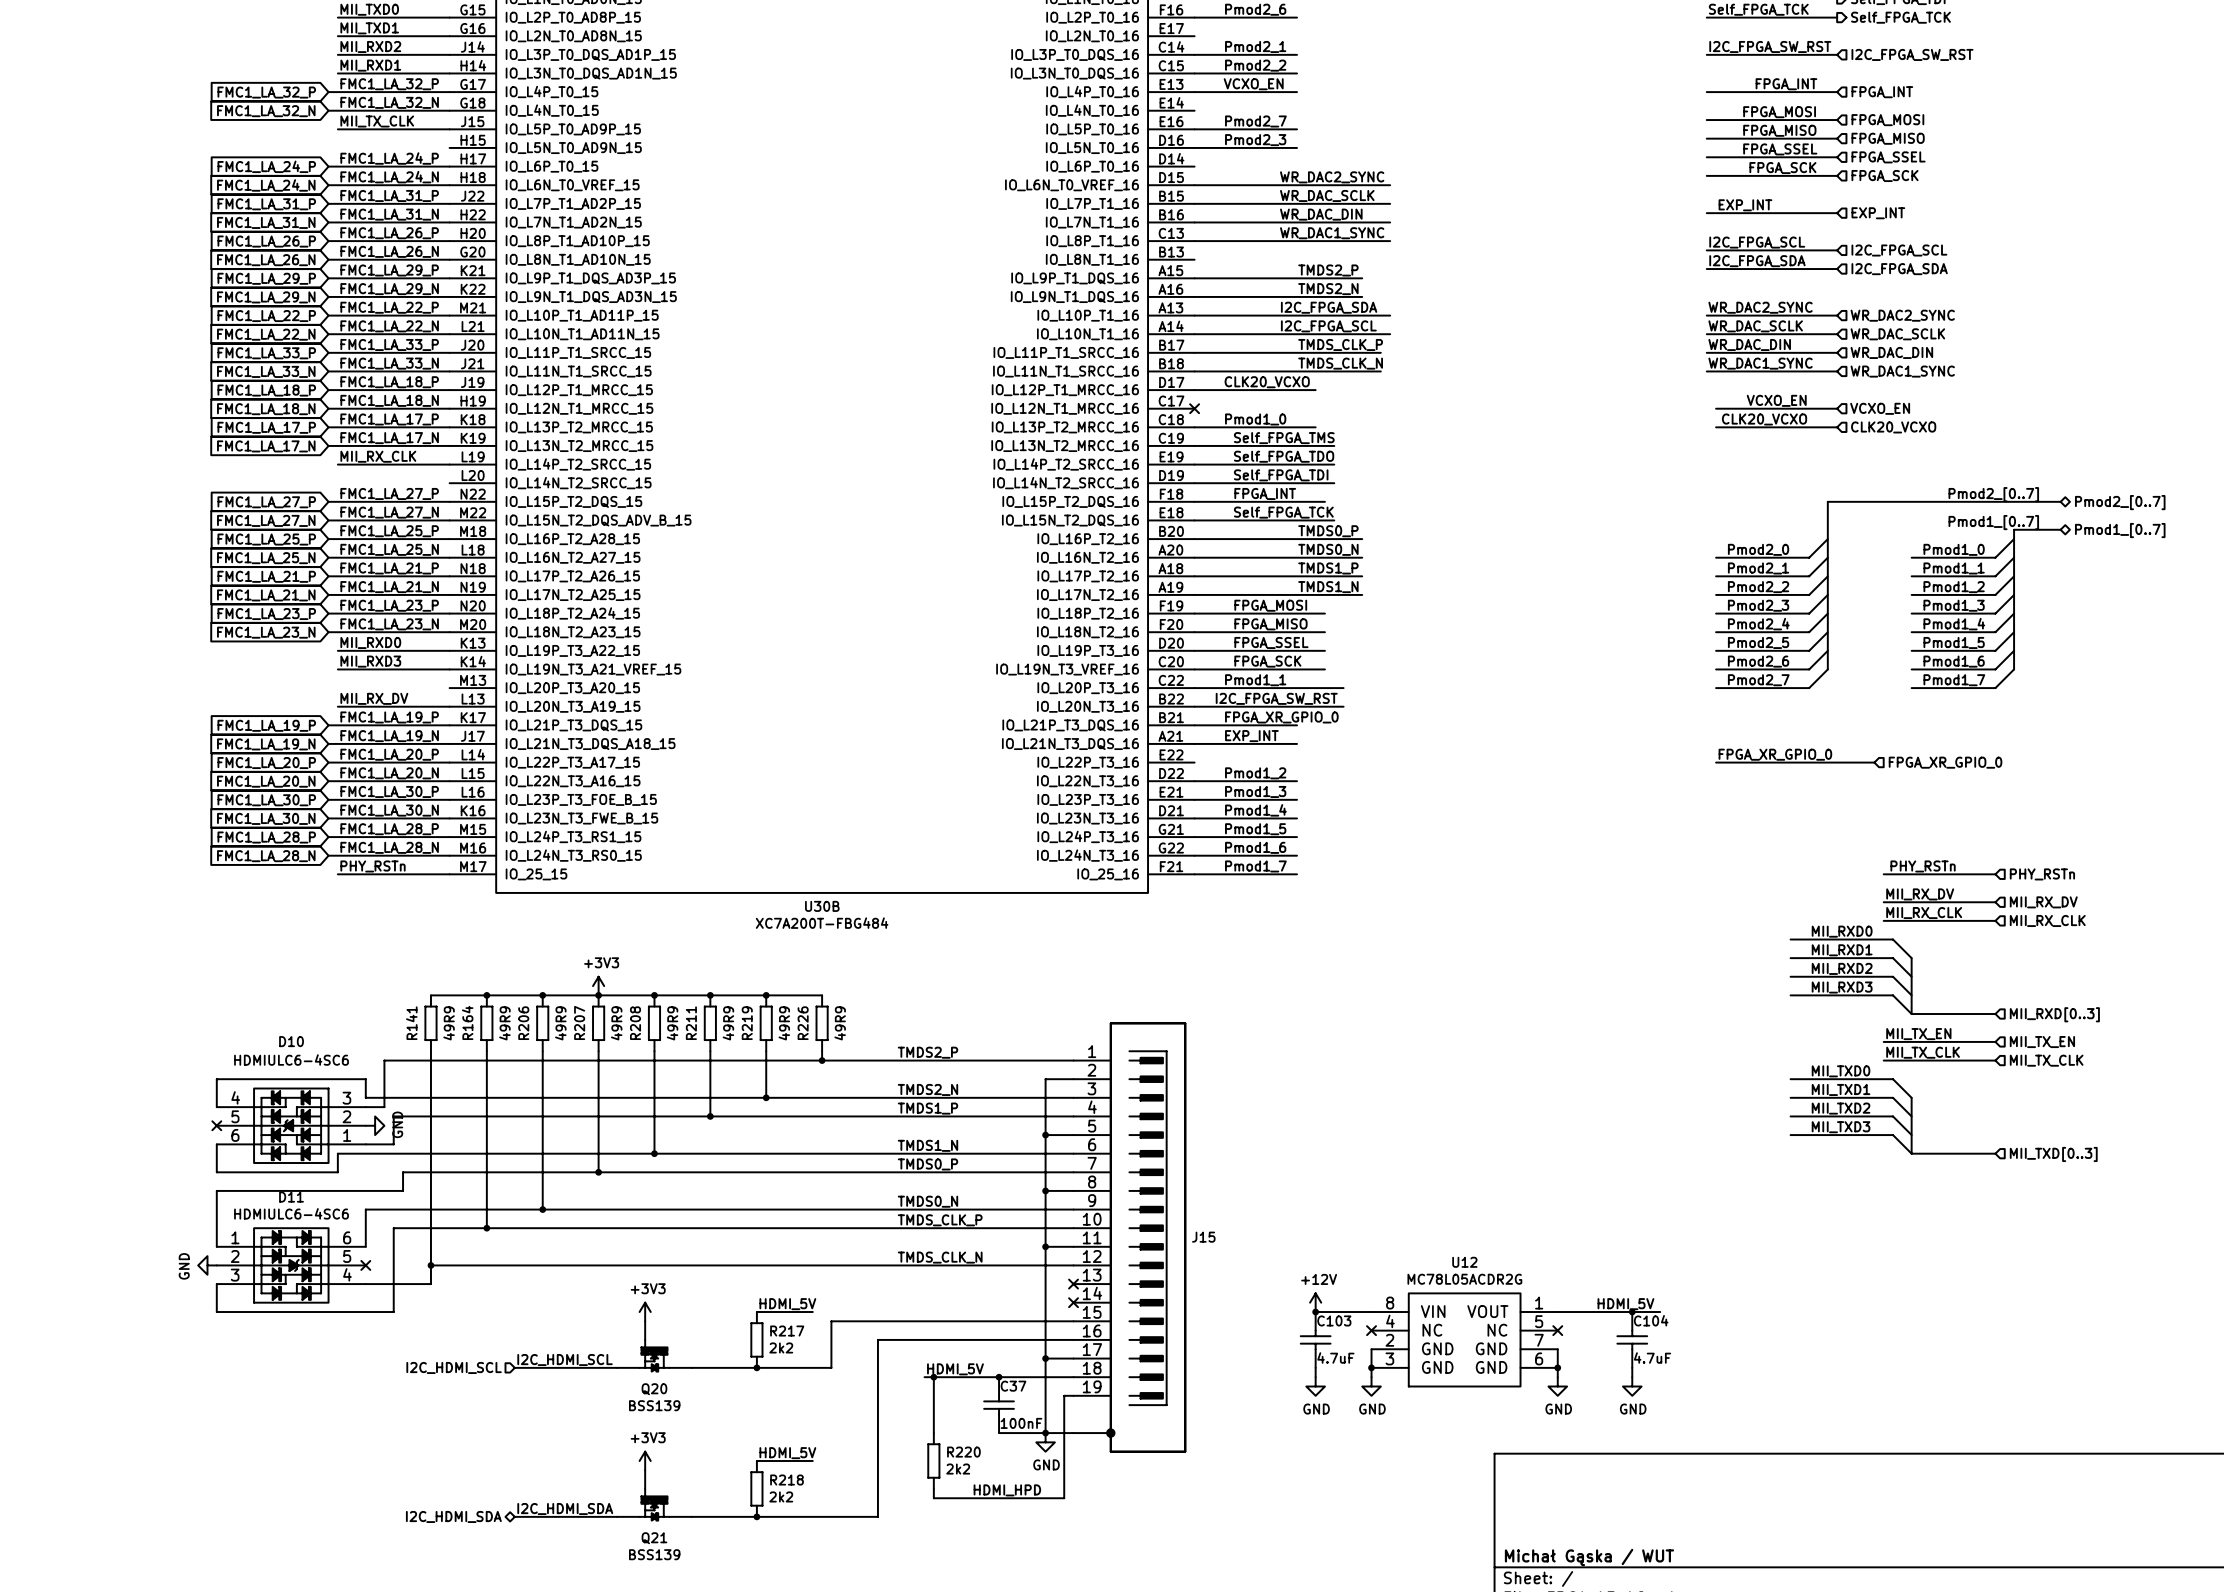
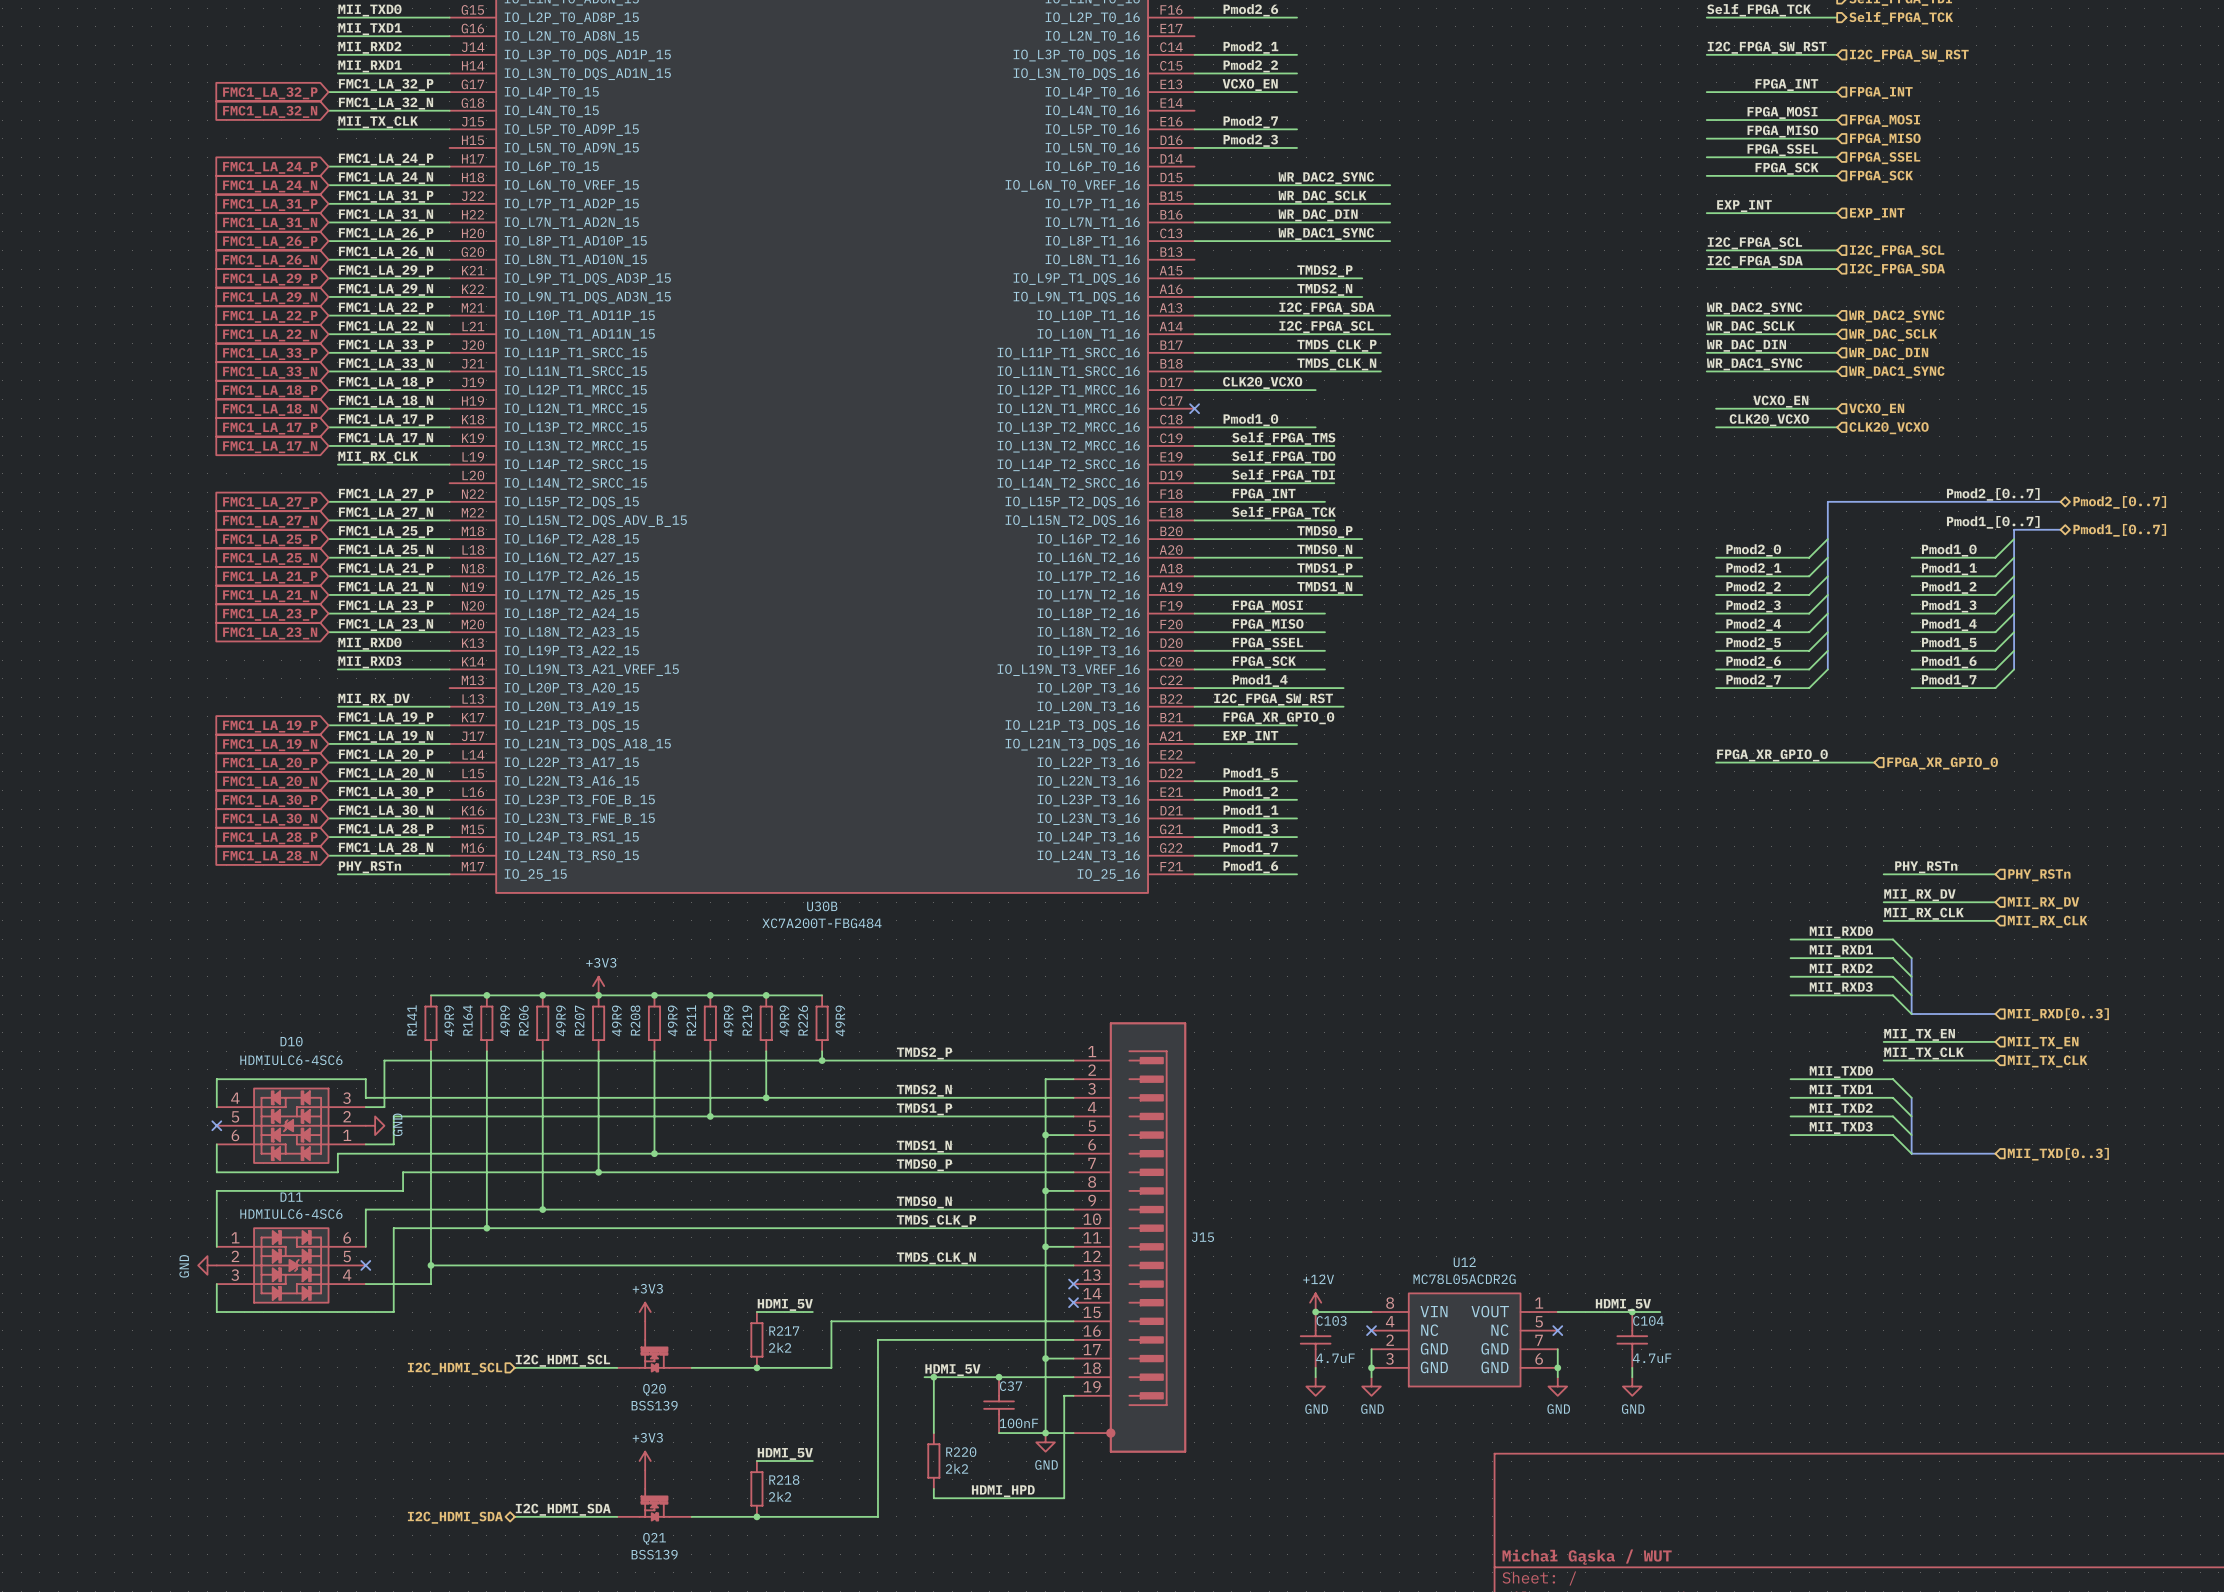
label: Pmod1_1 (1255, 680) -> Pmod1_4 (1260, 680)
label: Pmod1_2 (1255, 773) -> Pmod1_5 (1250, 773)
label: Pmod1_3 (1255, 791) -> Pmod1_2 (1250, 792)
label: Pmod1_4 (1255, 810) -> Pmod1_1 (1250, 811)
label: Pmod1_5 (1255, 829) -> Pmod1_3 (1250, 829)
label: Pmod1_6 (1255, 847) -> Pmod1_7 (1250, 848)
label: Pmod1_7 (1255, 866) -> Pmod1_6 (1250, 867)

